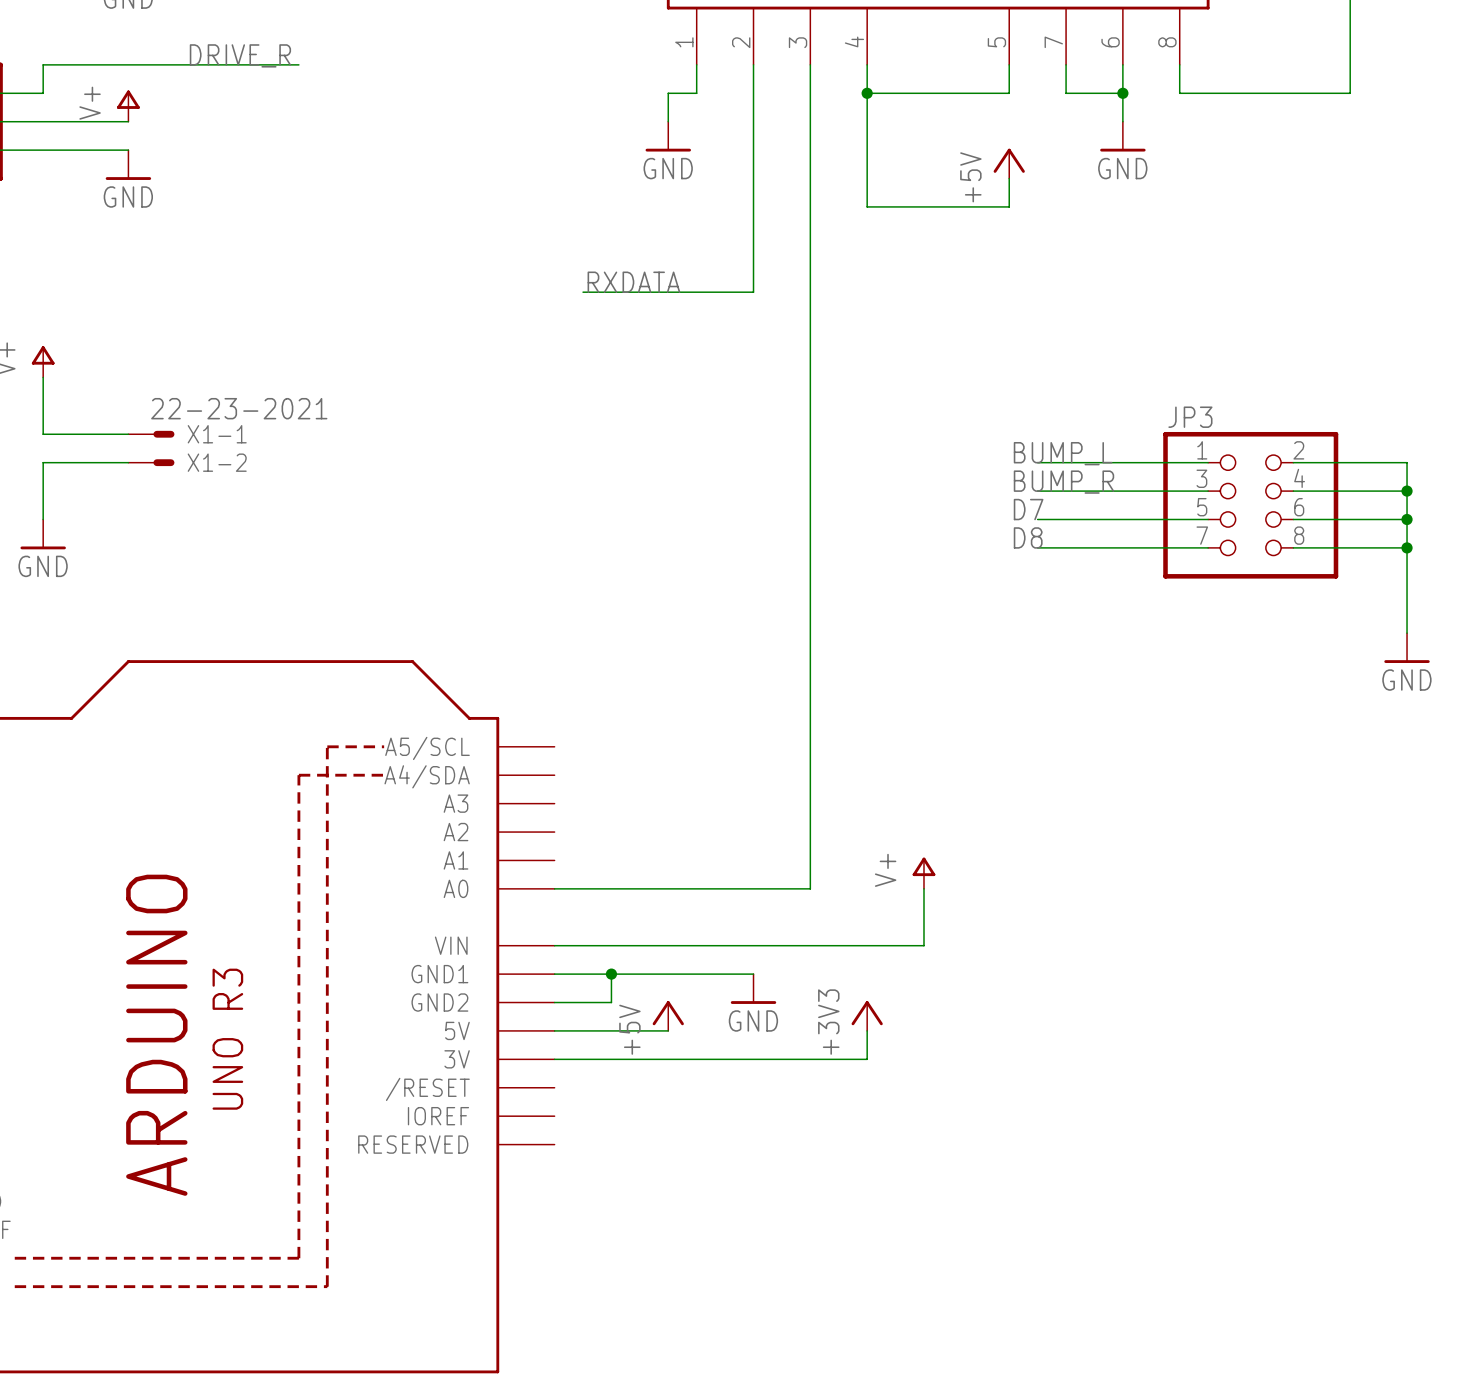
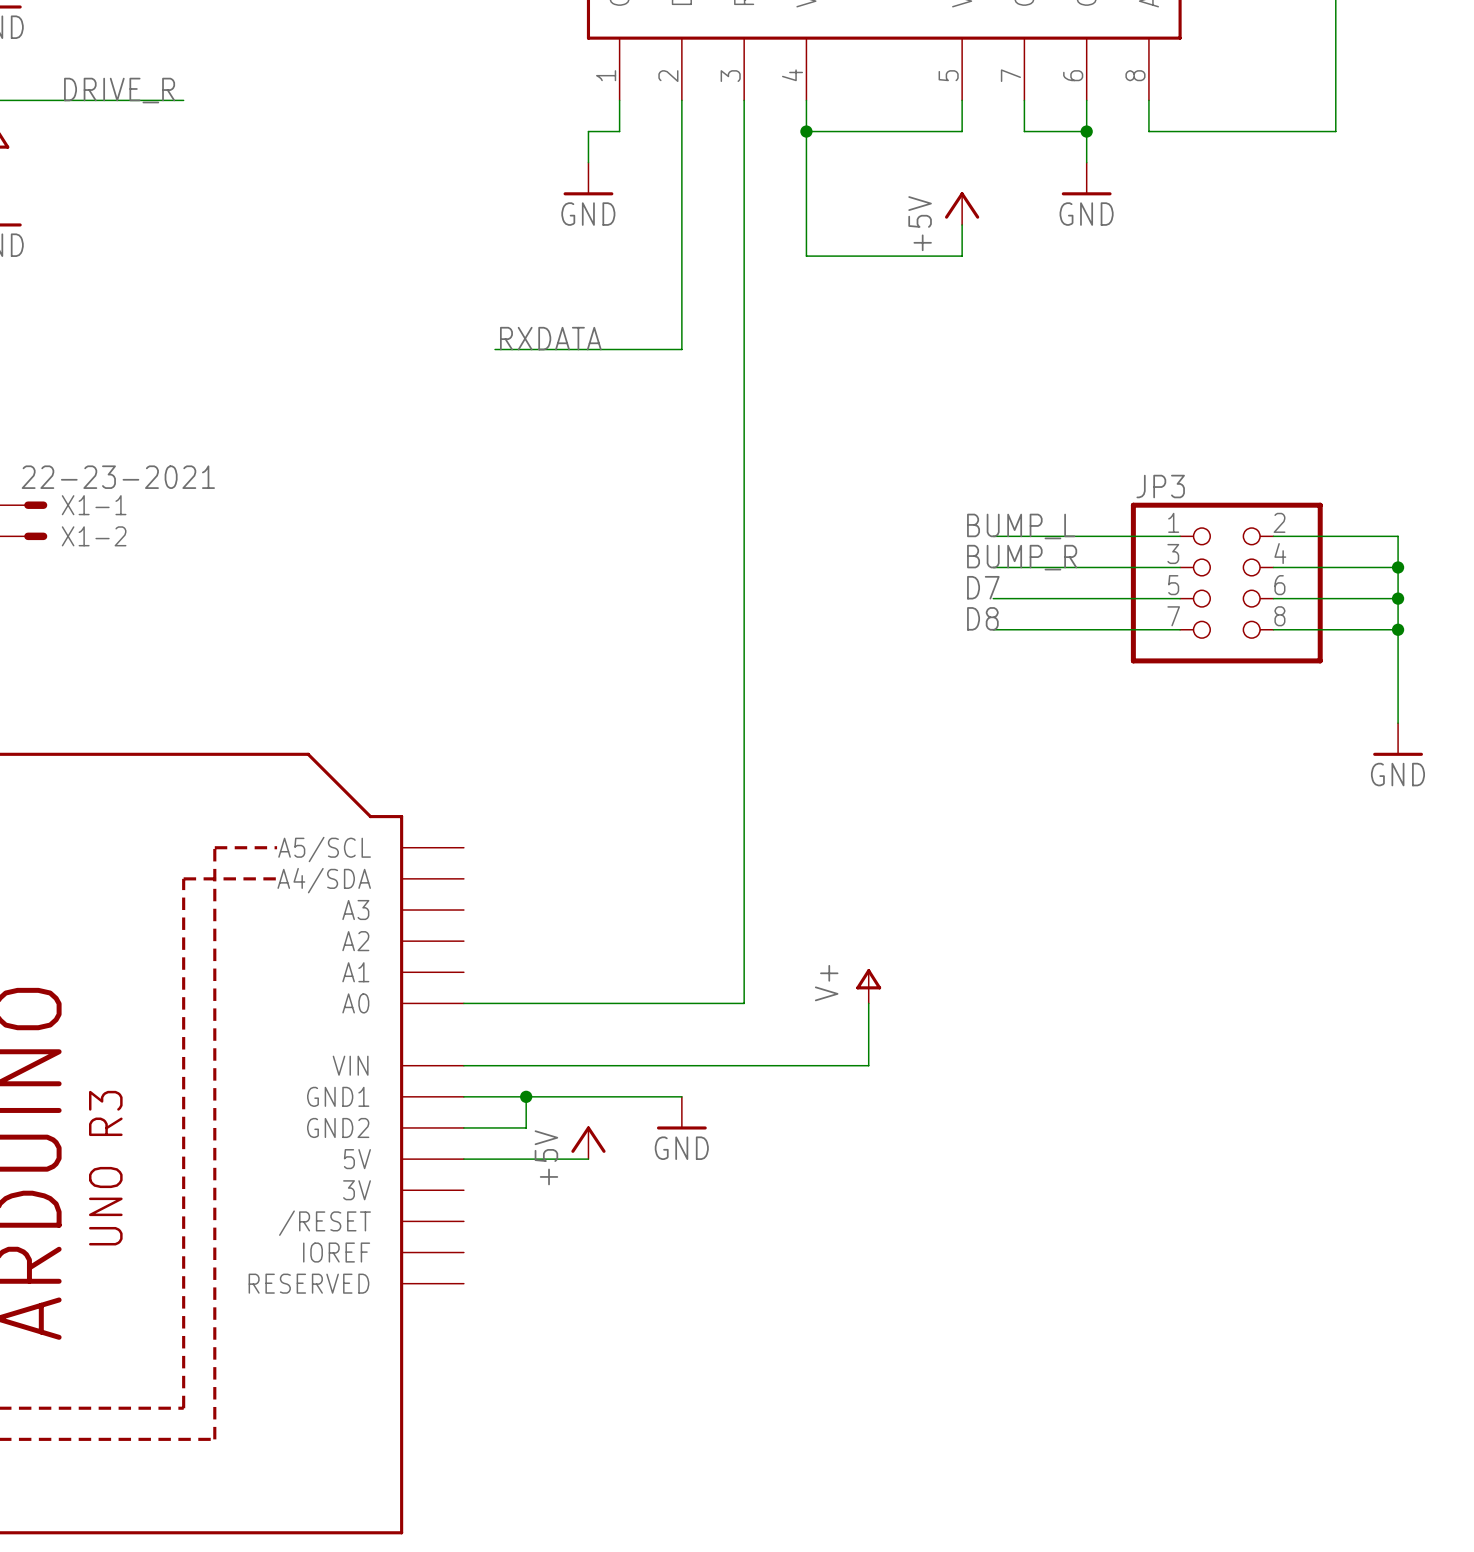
power symbol: +3V3 (867, 1016) -> none
wire: (867, 1030) (867, 1059) (554, 1059) -> none

